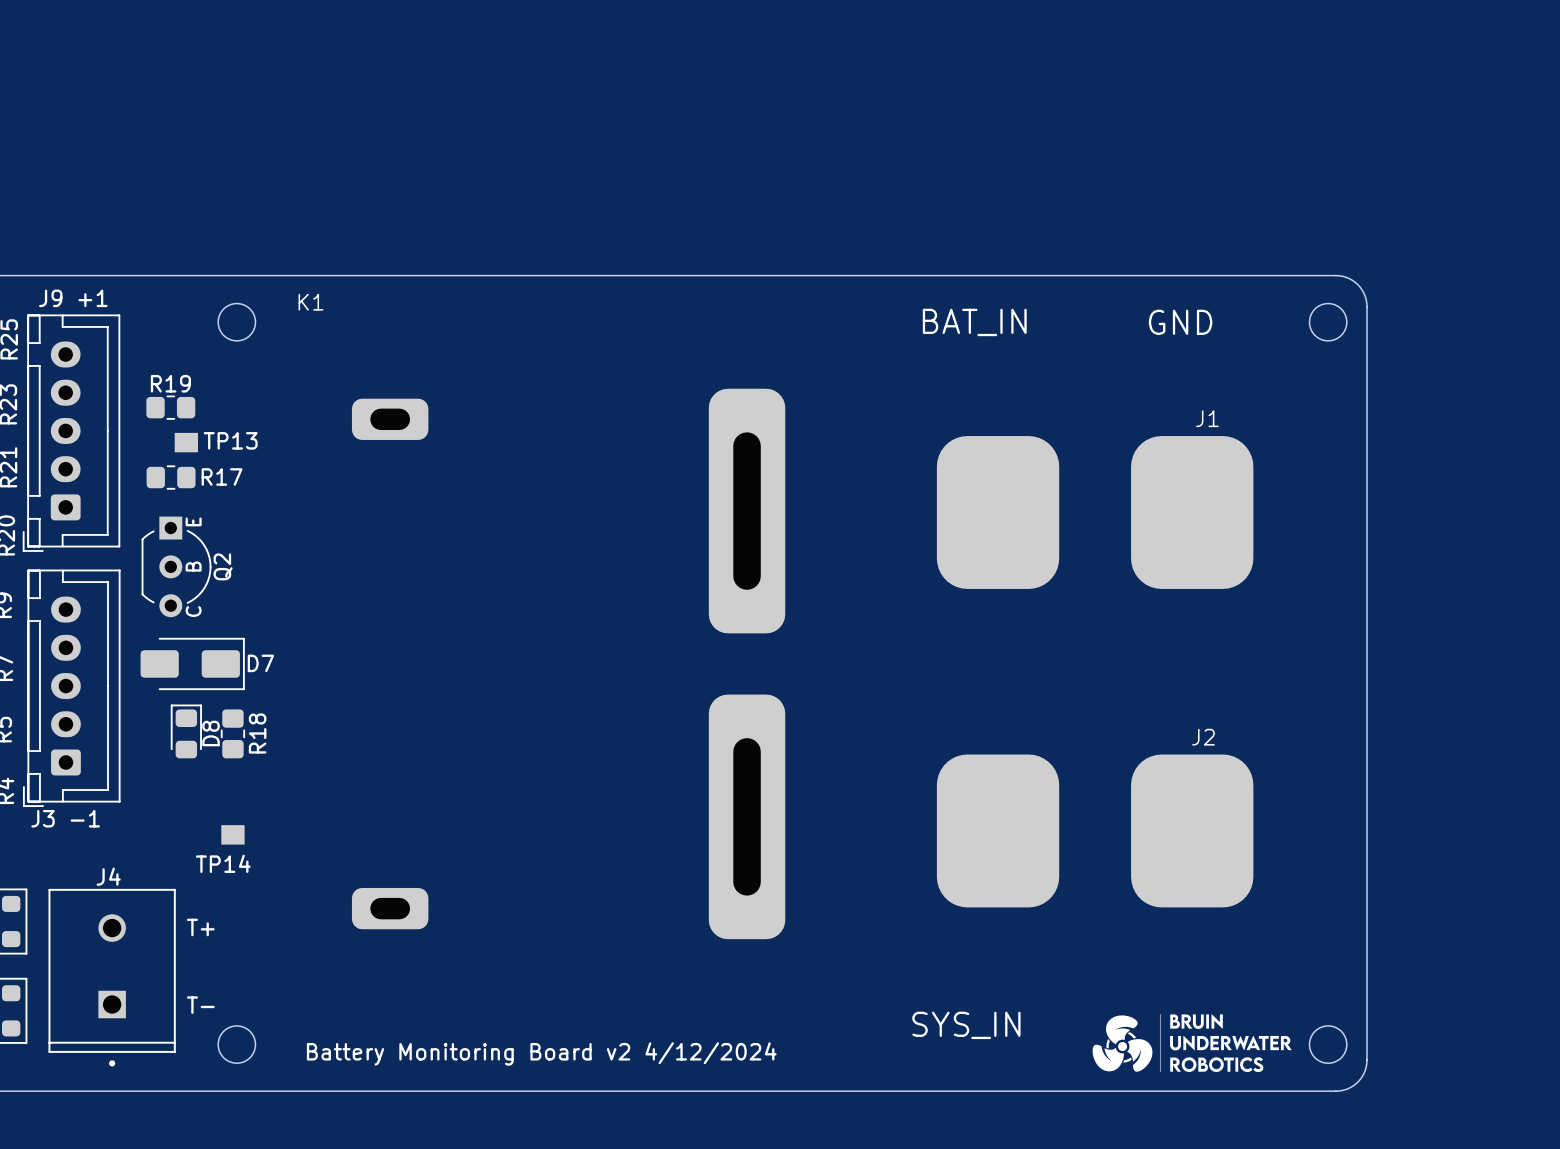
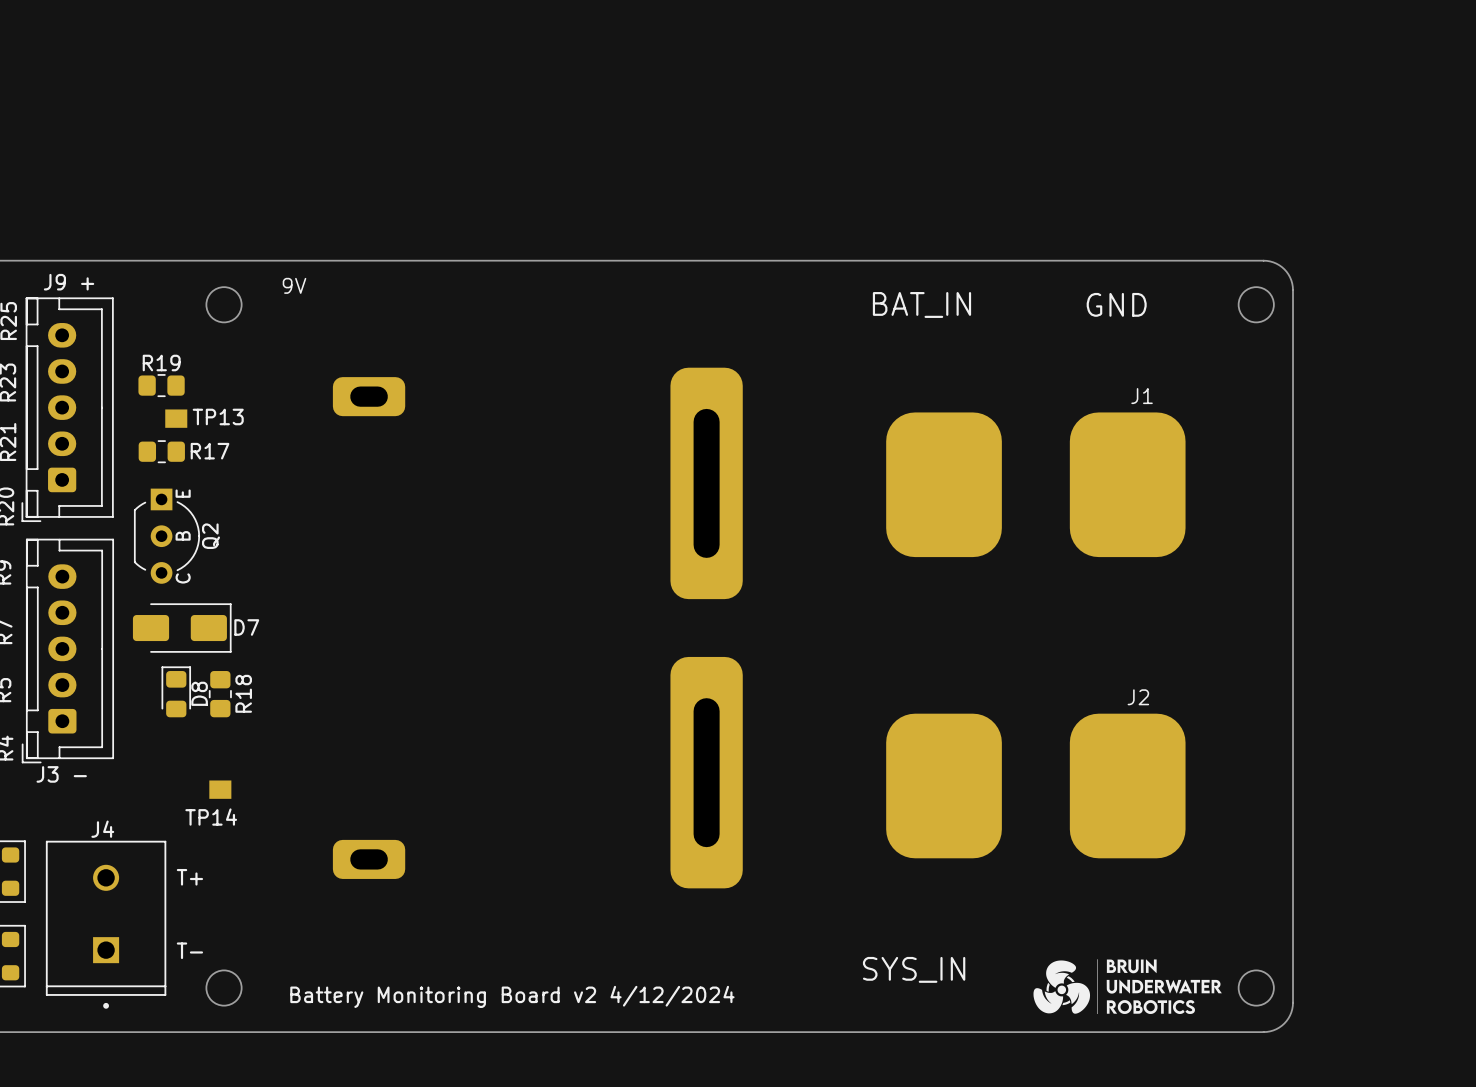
J9 +1 name: J9 +1 (73, 298) -> J9 + (69, 282)
K1 name: K1 (310, 302) -> 9V (294, 285)
J3 -1 name: J3 -1 (65, 818) -> J3 - (61, 774)

